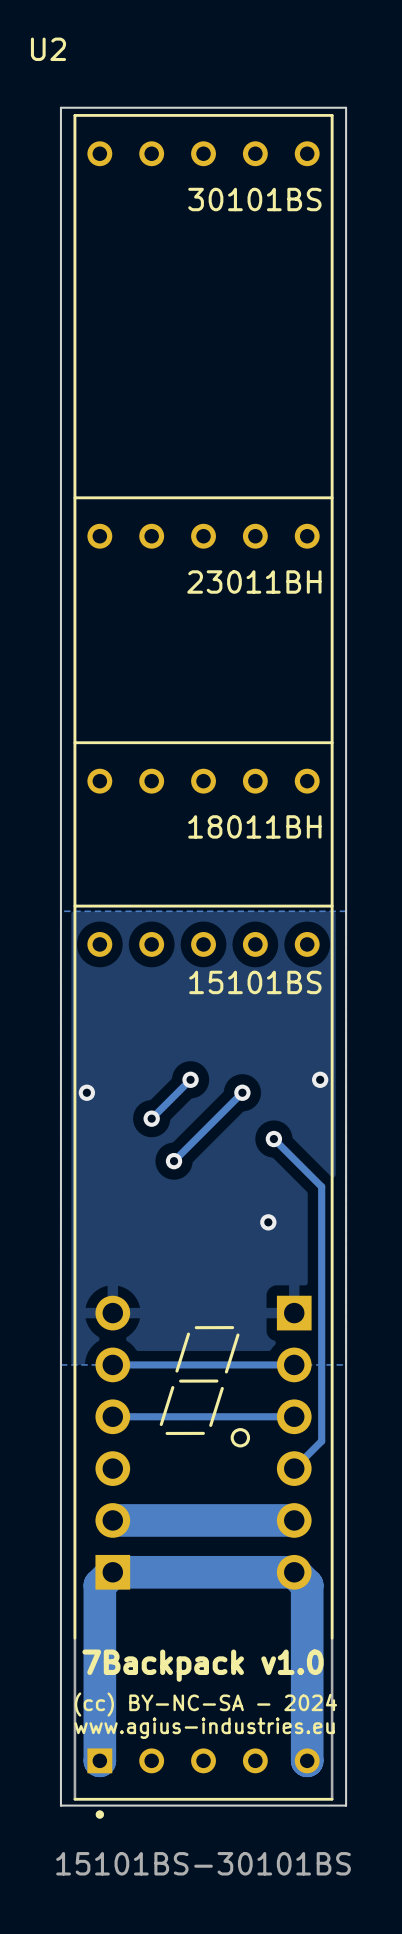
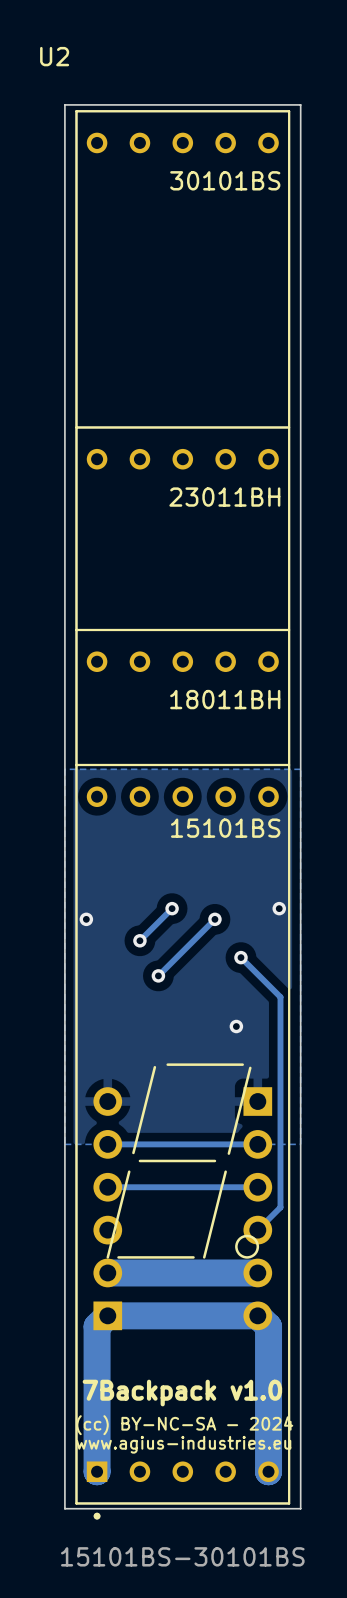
U2 footprint: [73, 114, 334, 1819] -> [75, 110, 291, 1520]

